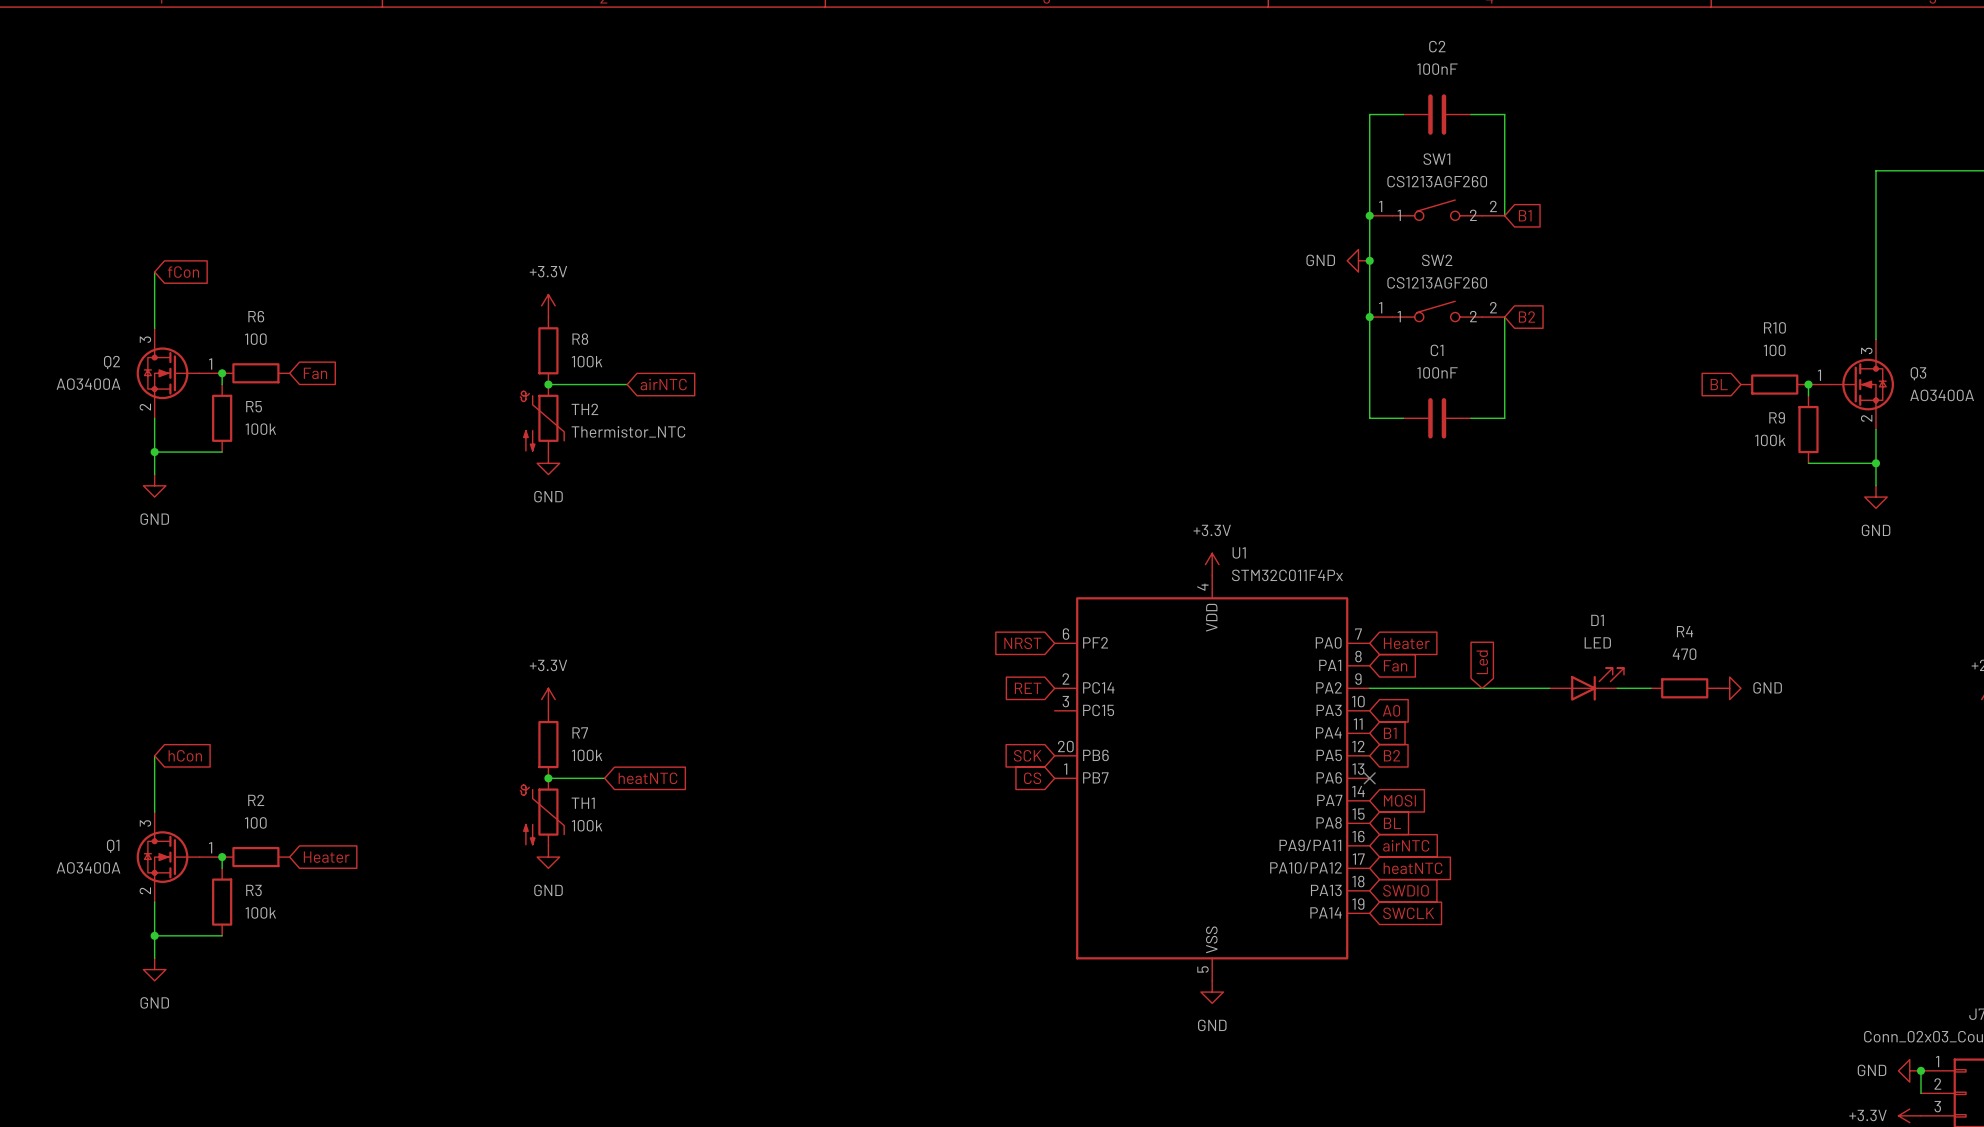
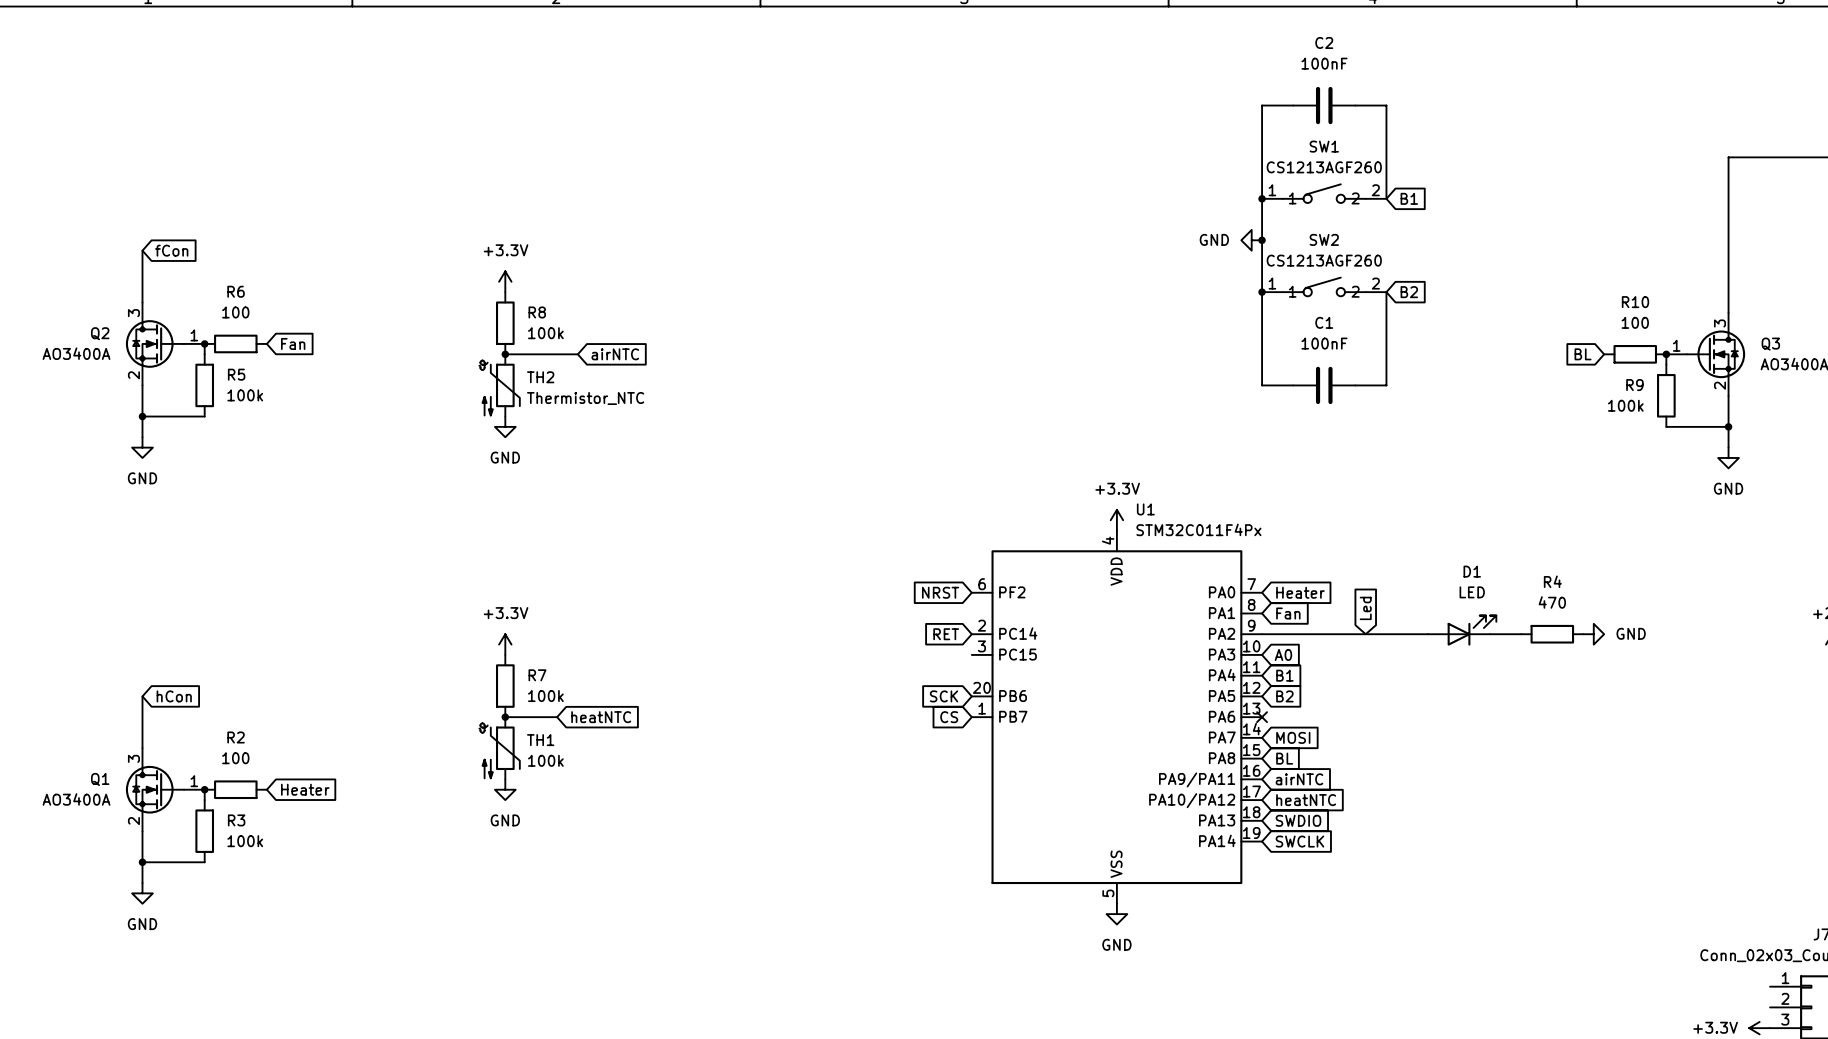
power symbol: GND (1909, 1070) -> none
wire: (1920, 1070) (1920, 1093) -> none
junction: (1920, 1070) -> none

